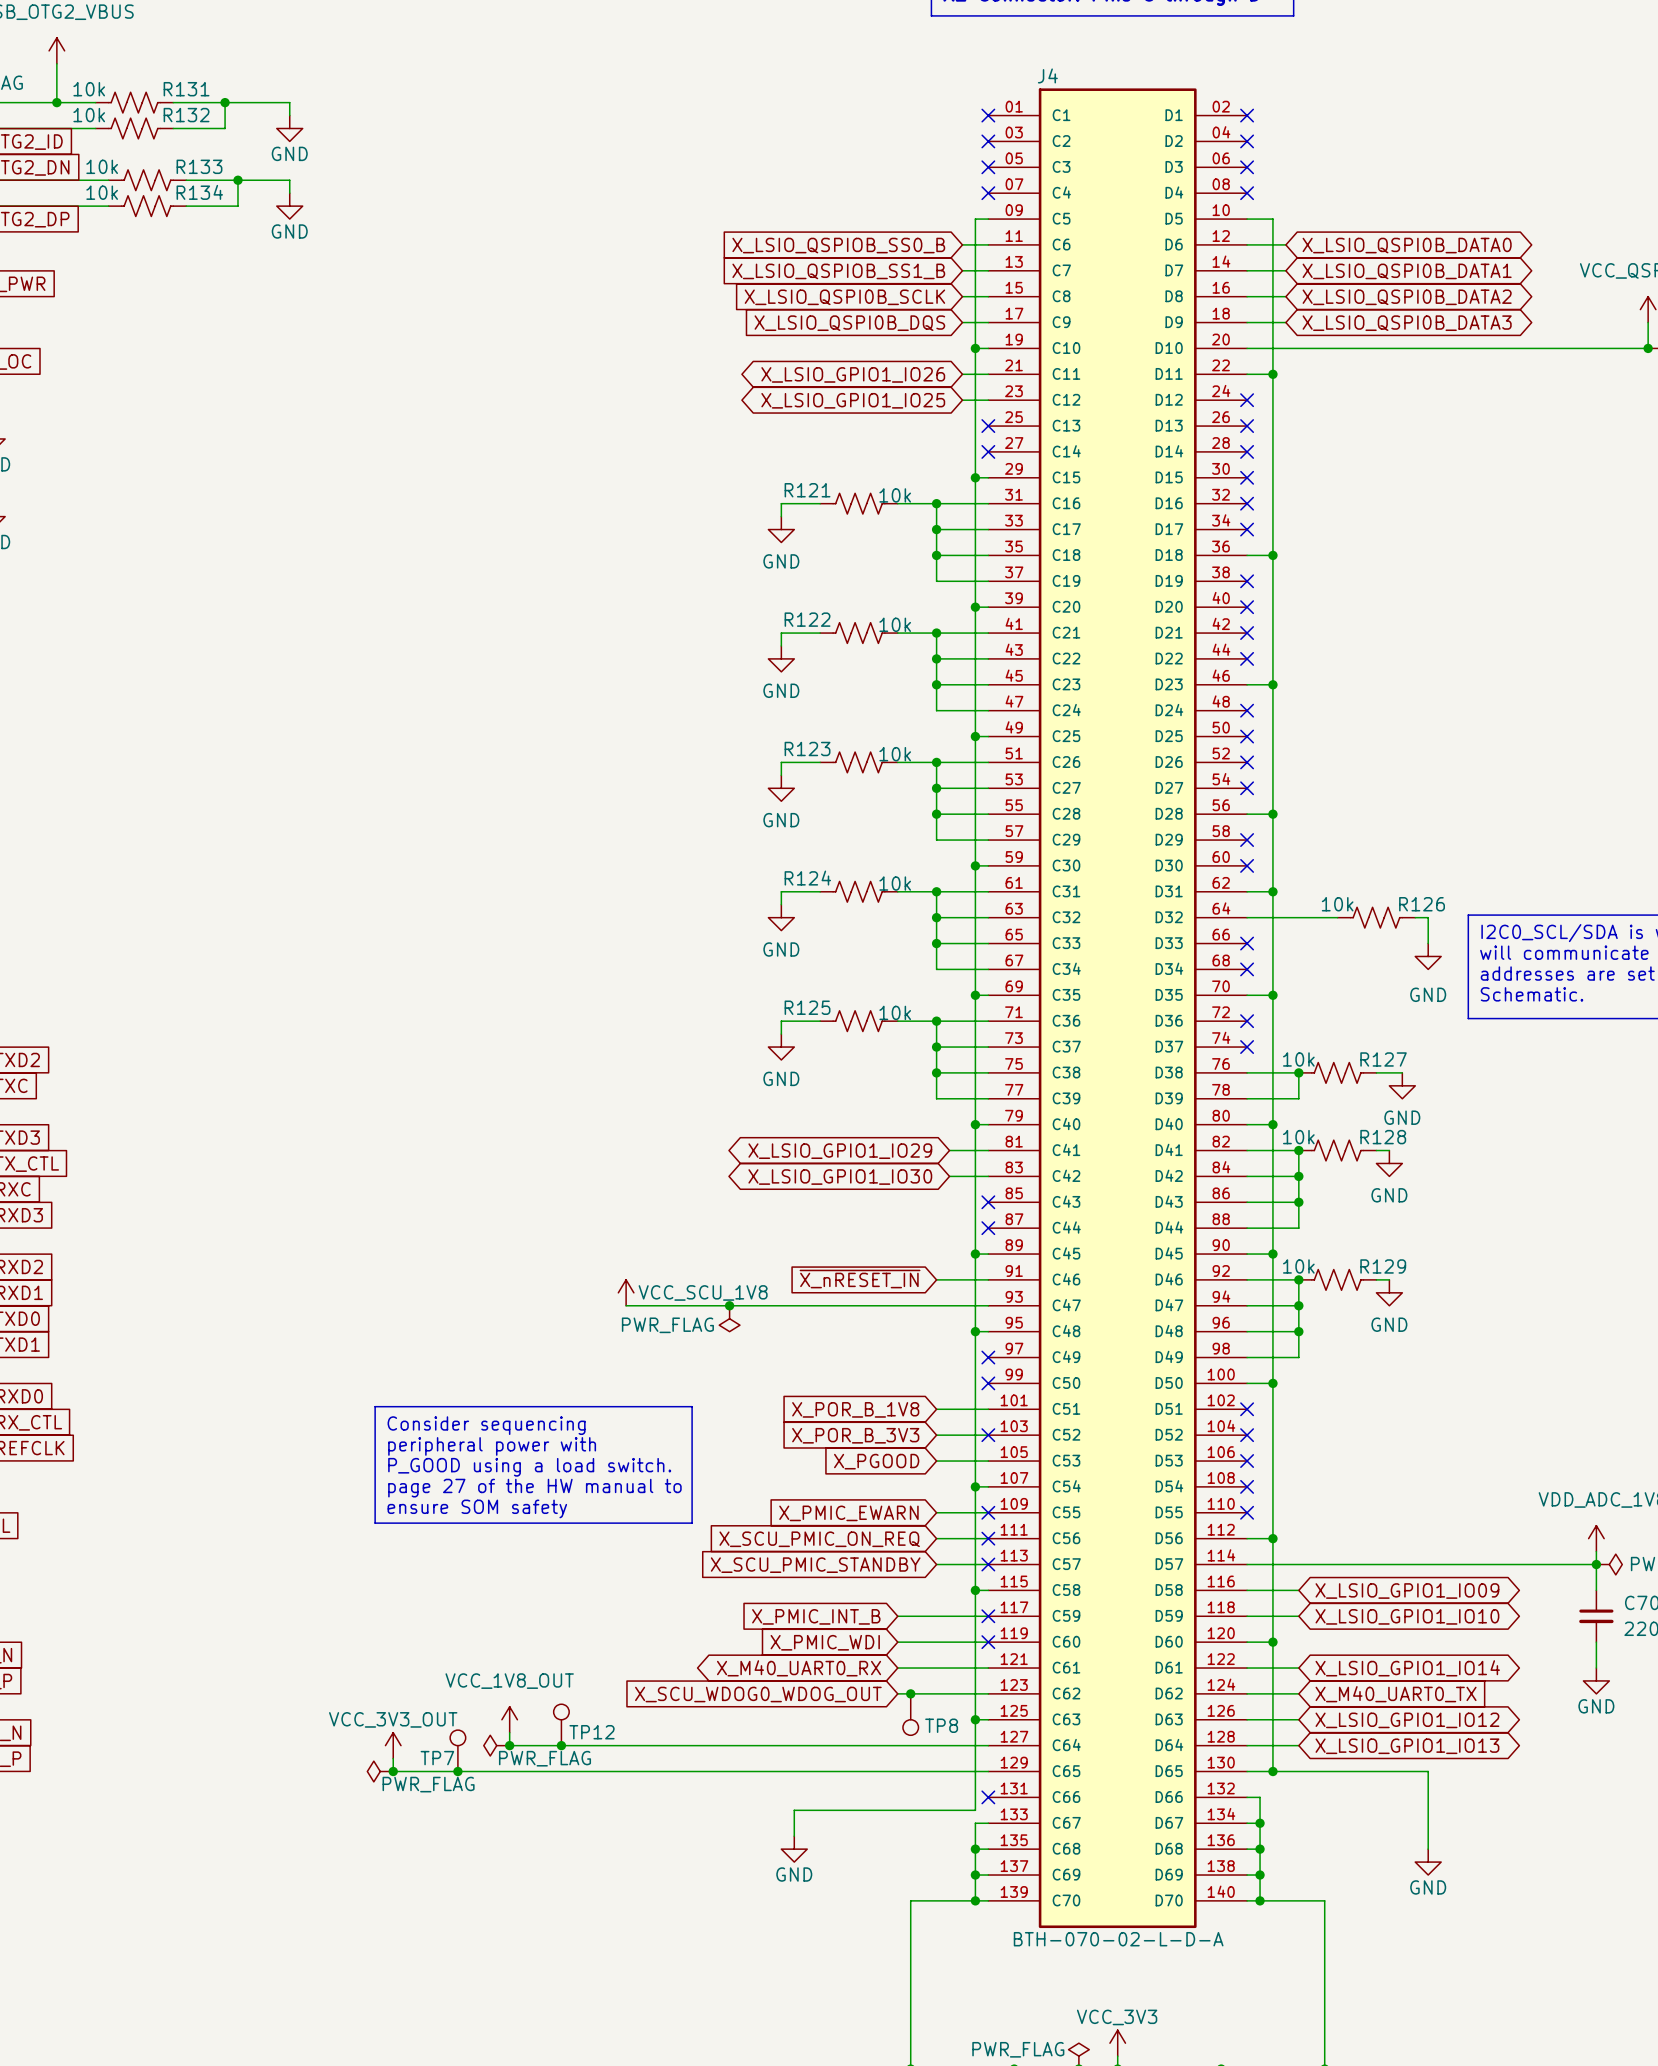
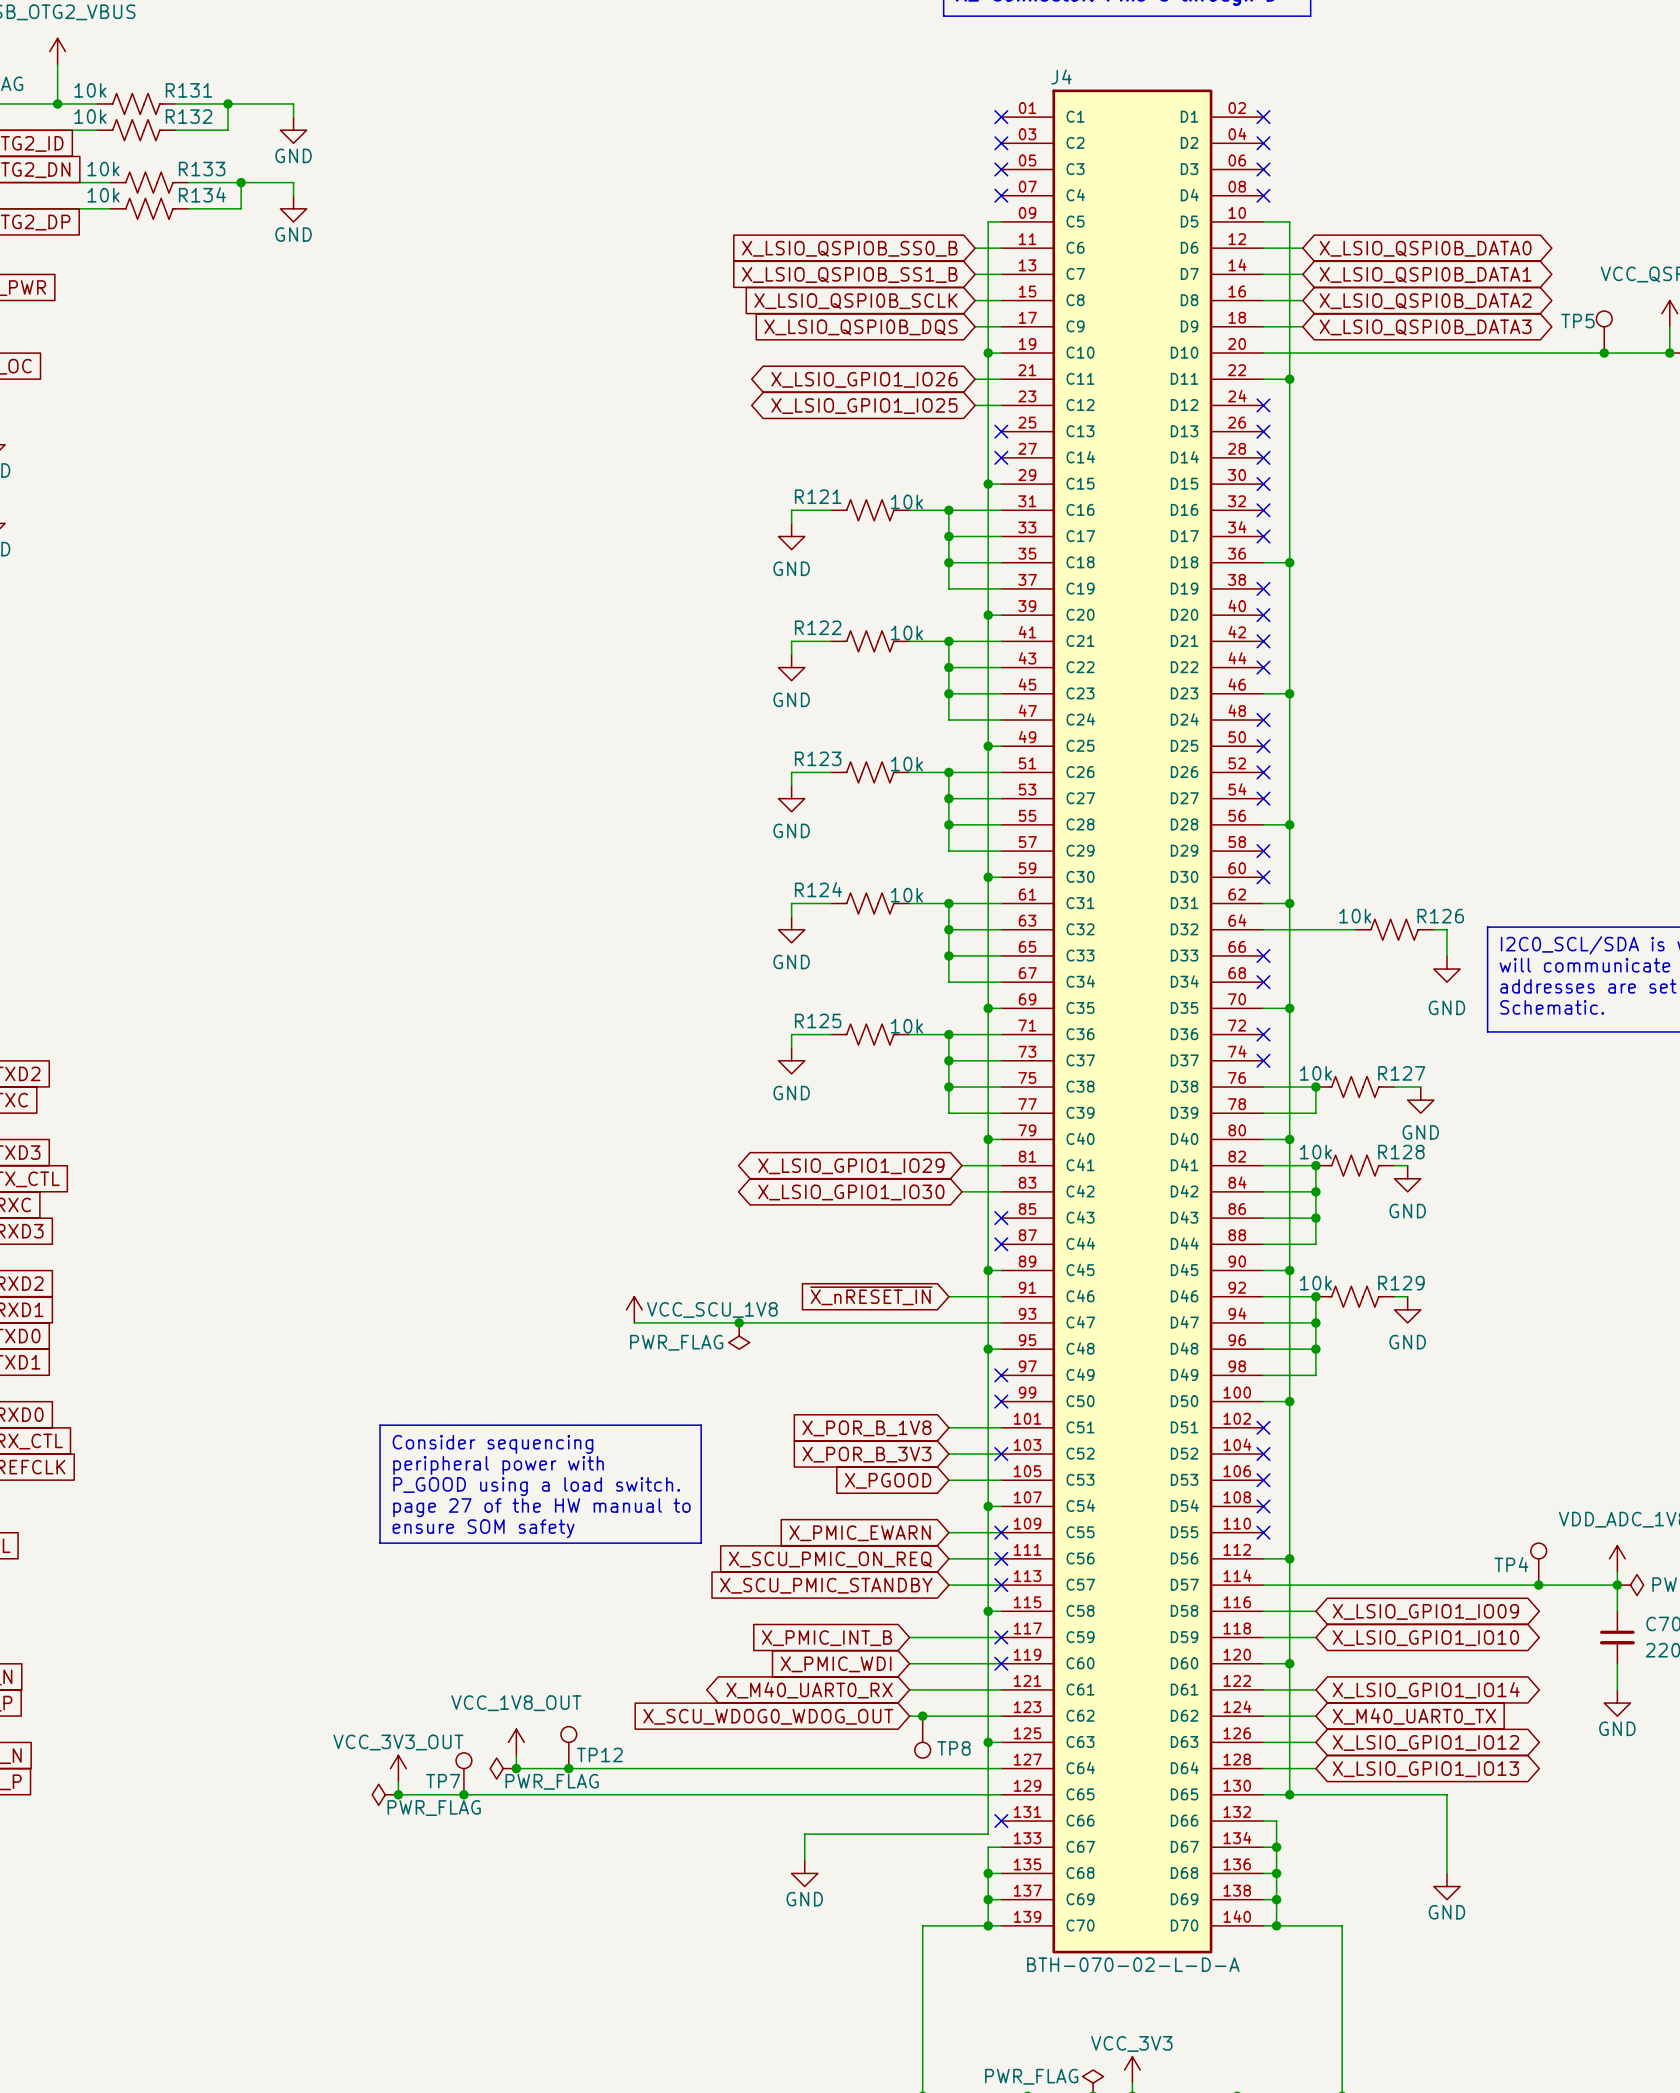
TP5: none -> (1604, 332)
junction: none -> (1604, 353)
TP4: none -> (1538, 1564)
junction: none -> (1538, 1585)

